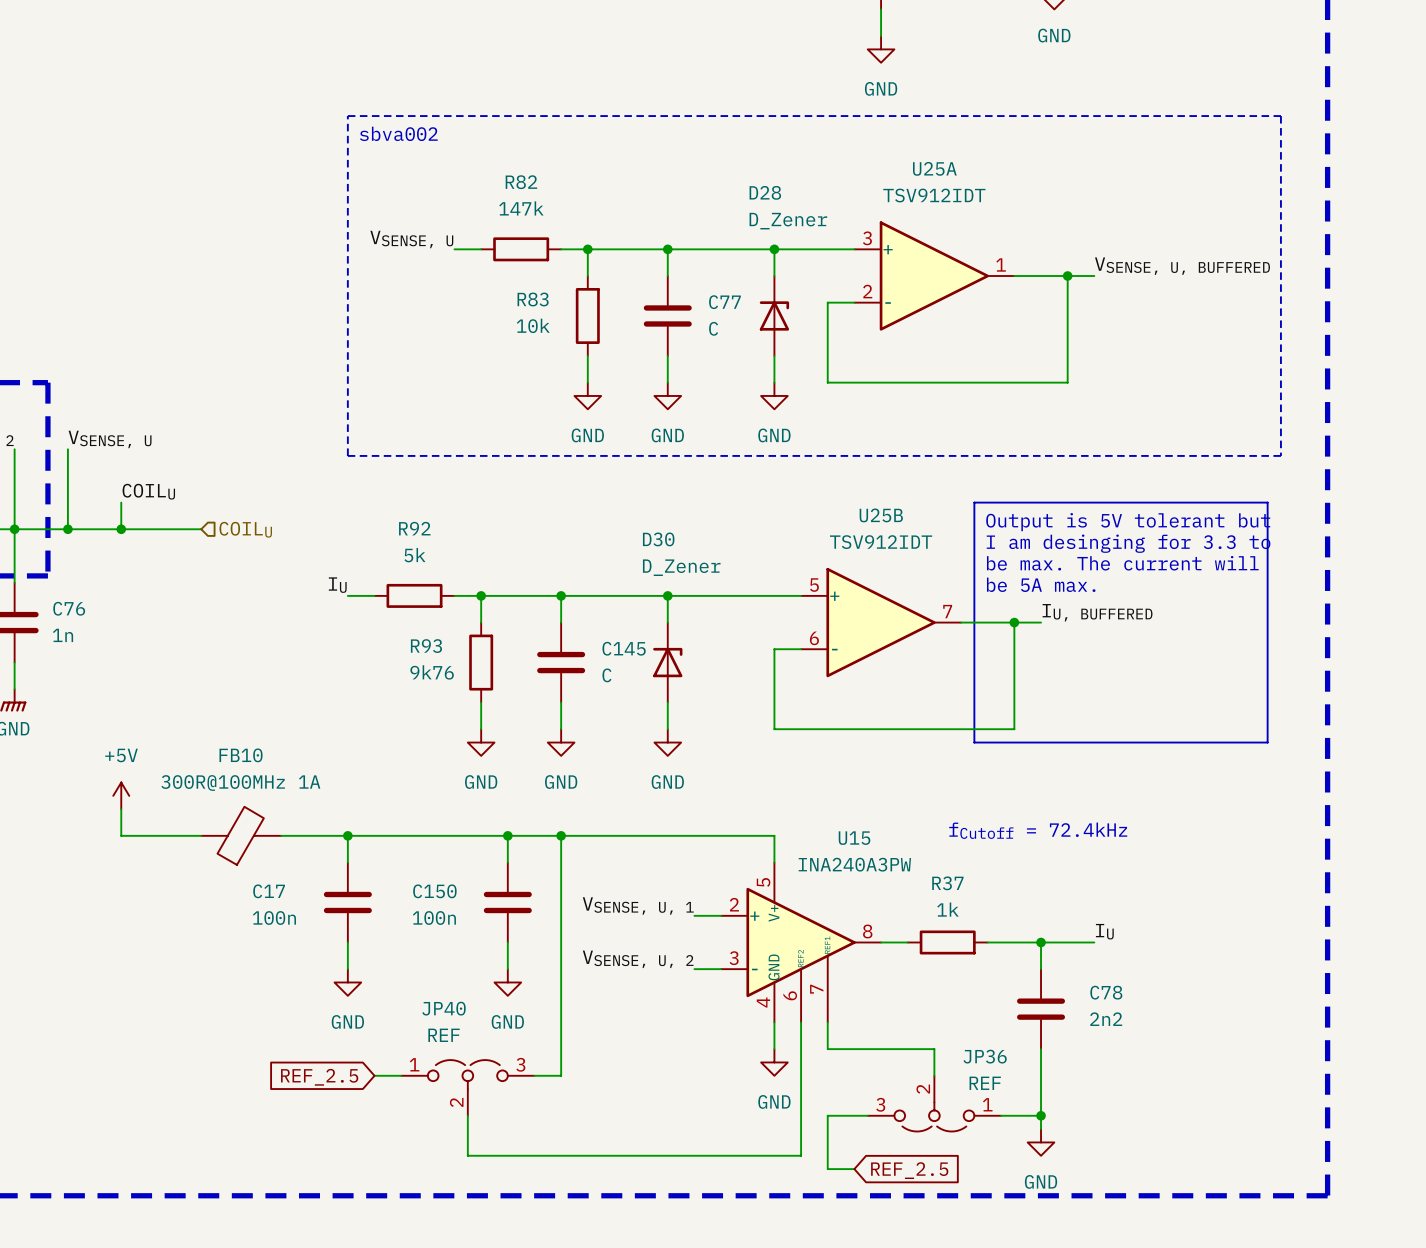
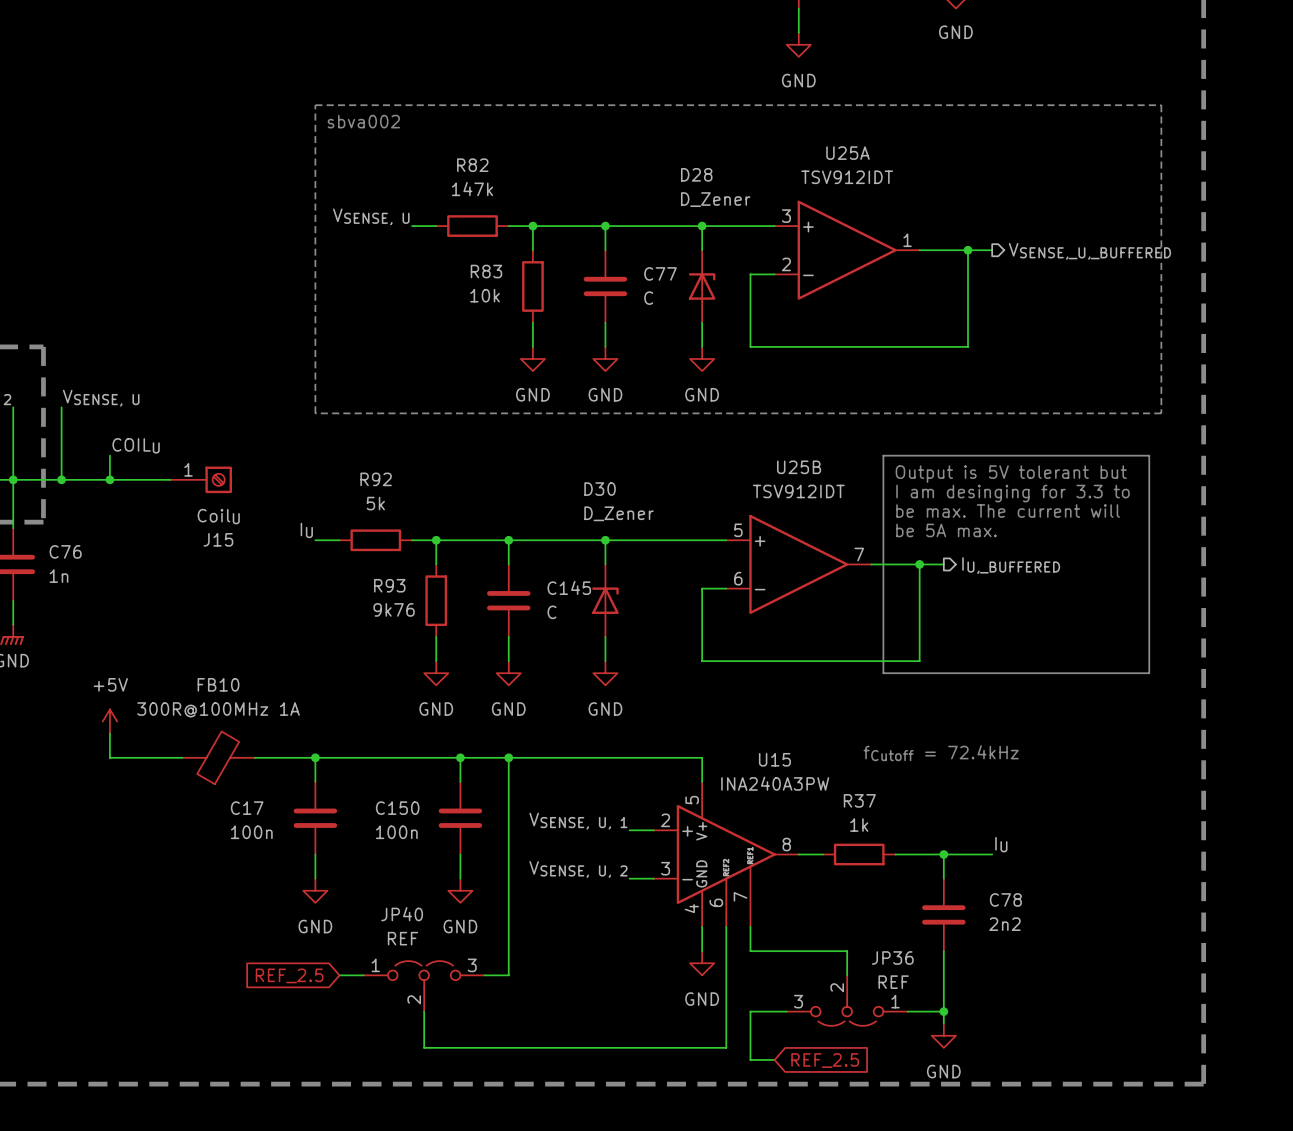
label: VSENSE, U, BUFFERED (1182, 266) -> none
hierarchical label: none -> VSENSE,_U,_BUFFERED (1089, 251)
J15: none -> CoilU (201, 479)
hierarchical label: COILU (245, 529) -> none
label: IU, BUFFERED (1097, 612) -> none
hierarchical label: none -> IU,_BUFFERED (1011, 565)

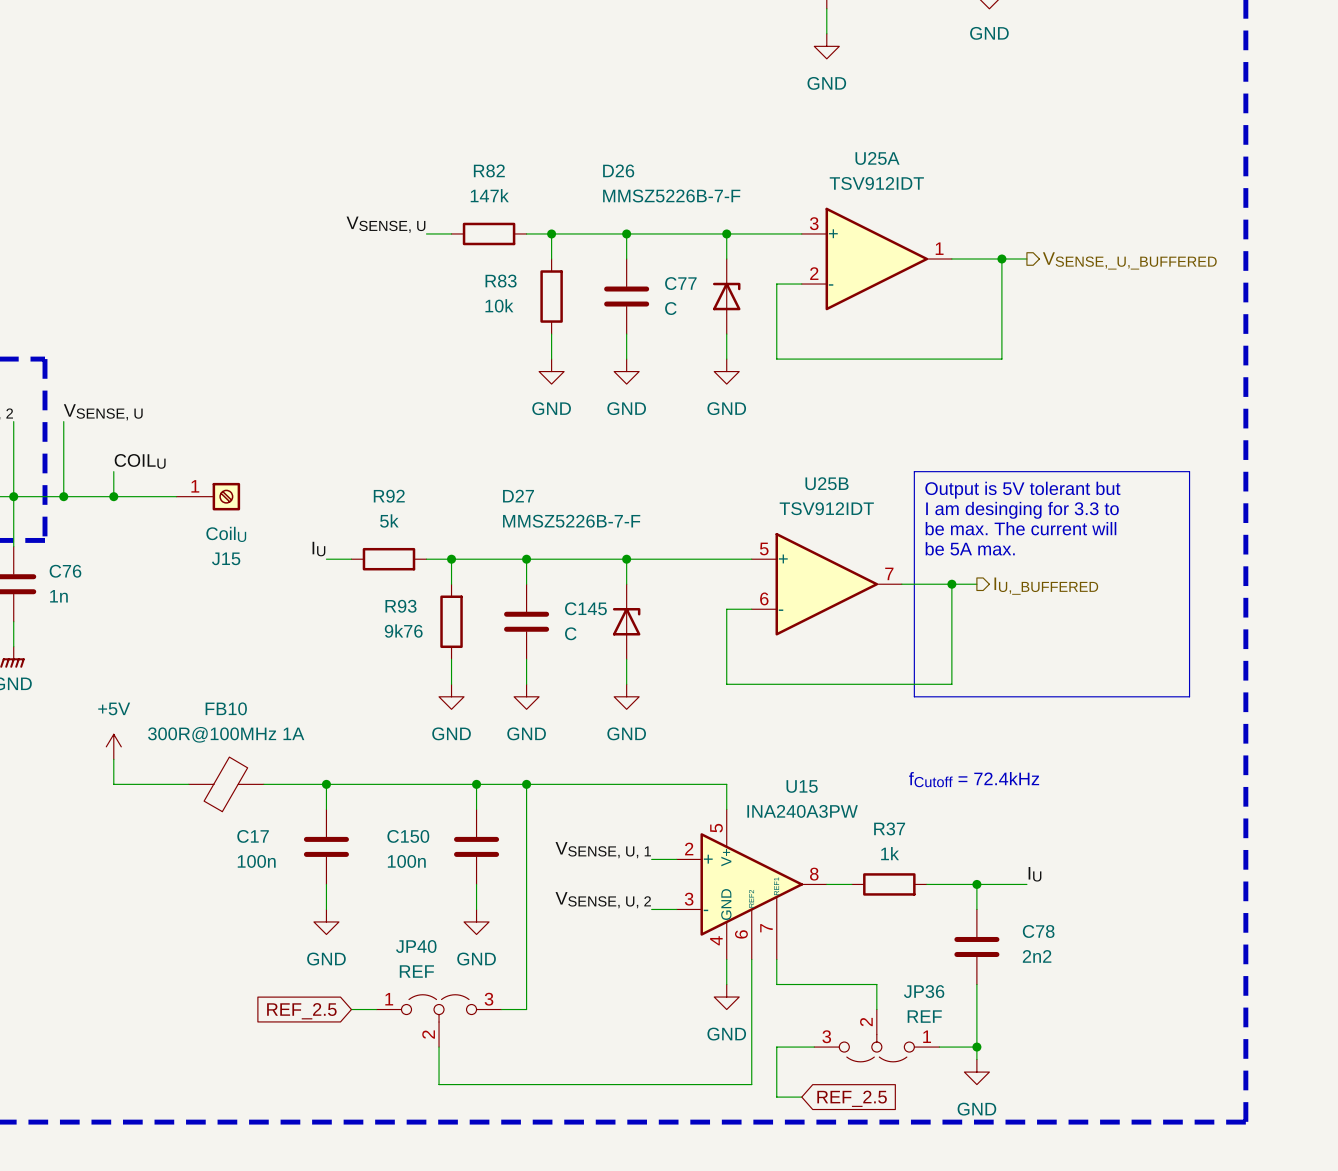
line: (315, 105) (1161, 105) (1161, 413) (315, 413) (315, 105) -> none
text: sbva002 (363, 121) -> none
D28 name: D28 (696, 174) -> D26 (618, 170)
D28 value: D_Zener (715, 199) -> MMSZ5226B-7-F (671, 195)
D30 name: D30 (600, 489) -> D27 (518, 496)
D30 value: D_Zener (619, 513) -> MMSZ5226B-7-F (571, 521)

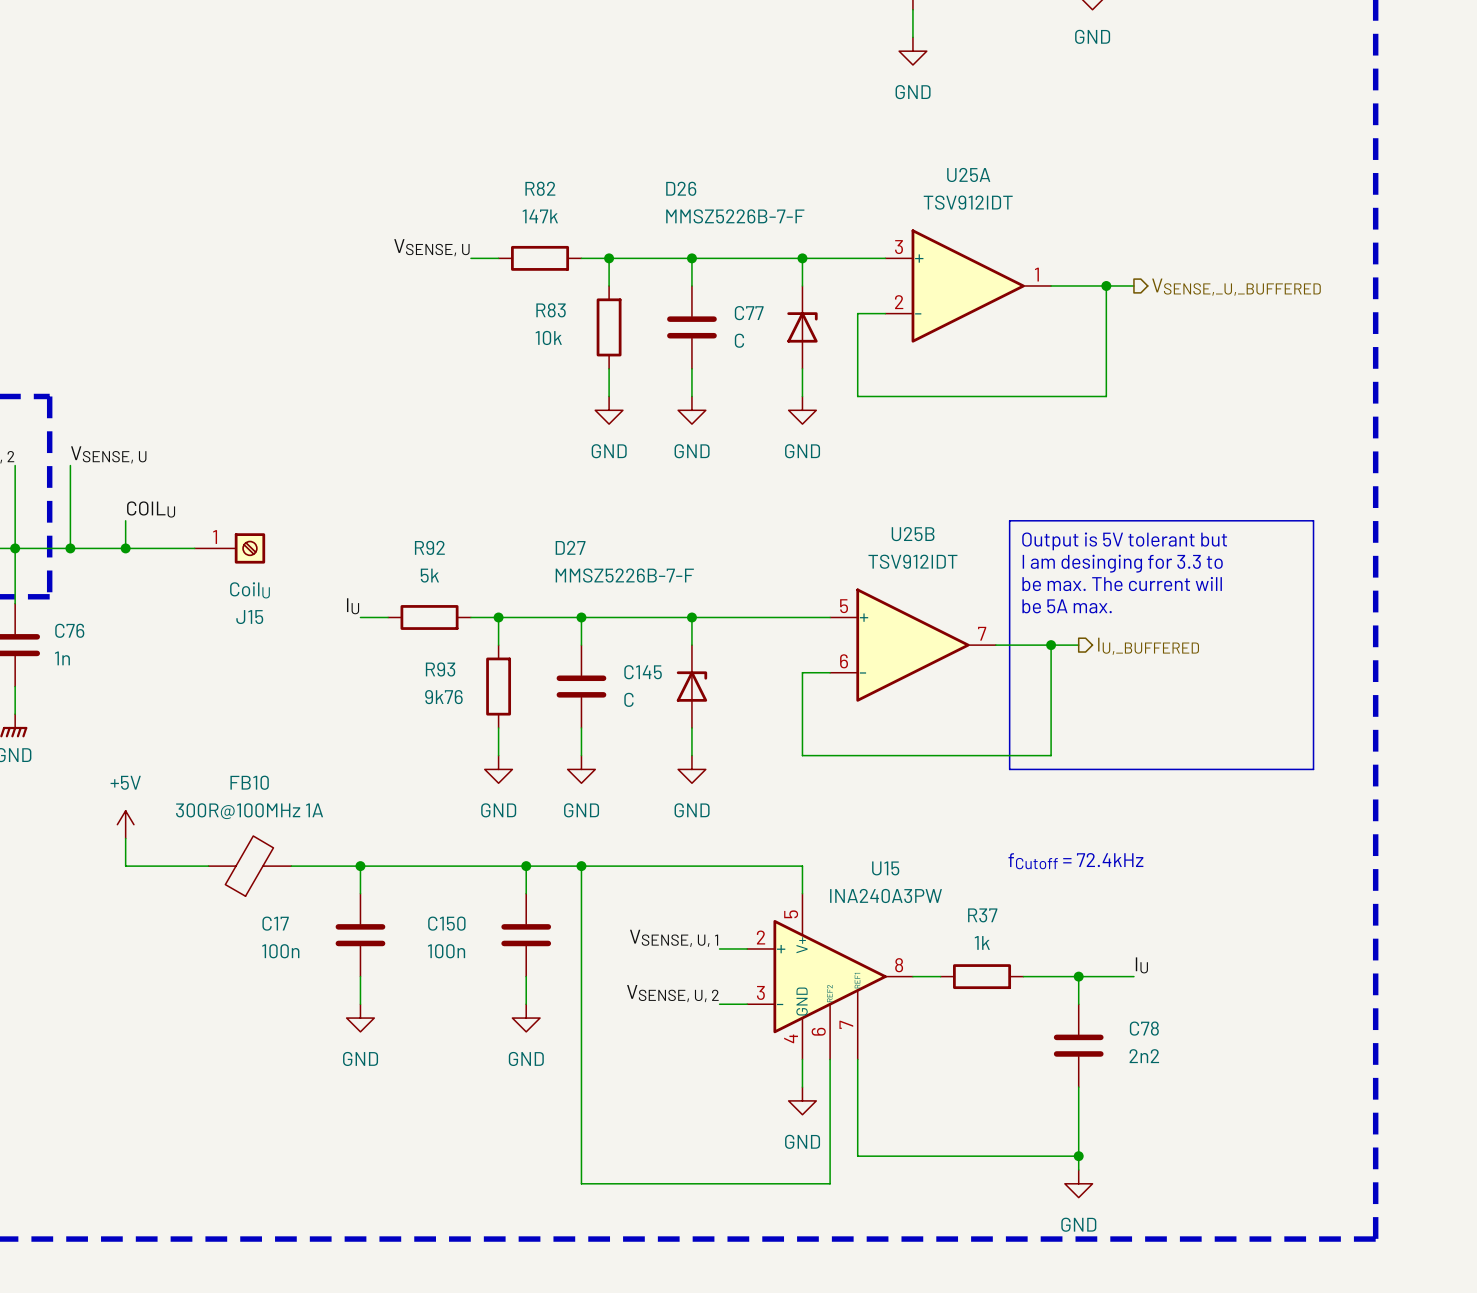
wire: (776, 984) (876, 984) (876, 1009) -> (857, 1087) (857, 1156)
wire: (351, 1009) (376, 1009) -> none
wire: (501, 1009) (526, 1009) -> none
global label: REF_2.5 (301, 1011) -> none
JP40: REF (439, 1020) -> none
JP36: REF (876, 1035) -> none
wire: (439, 1047) (439, 1084) (751, 1084) (751, 1072) -> (581, 1114) (581, 1183) (830, 1183)
wire: (776, 1047) (776, 1097) (801, 1097) -> none
wire: none -> (899, 1156) (1037, 1156)
global label: REF_2.5 (852, 1098) -> none

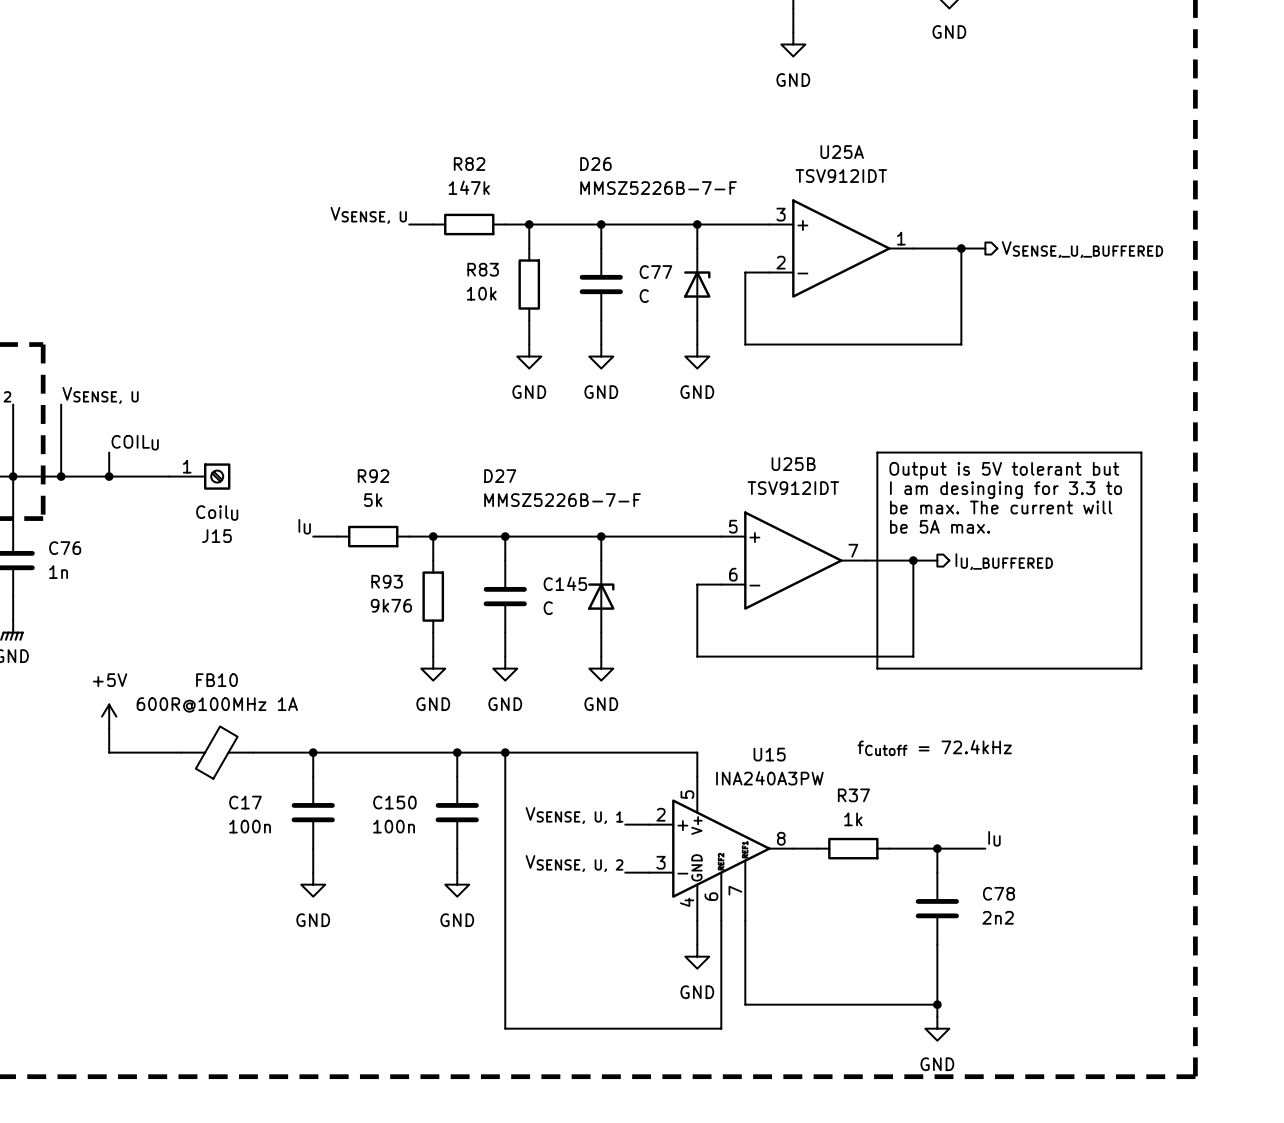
FB10 value: 300R@100MHz 1A (249, 811) -> 600R@100MHz 1A (217, 705)

